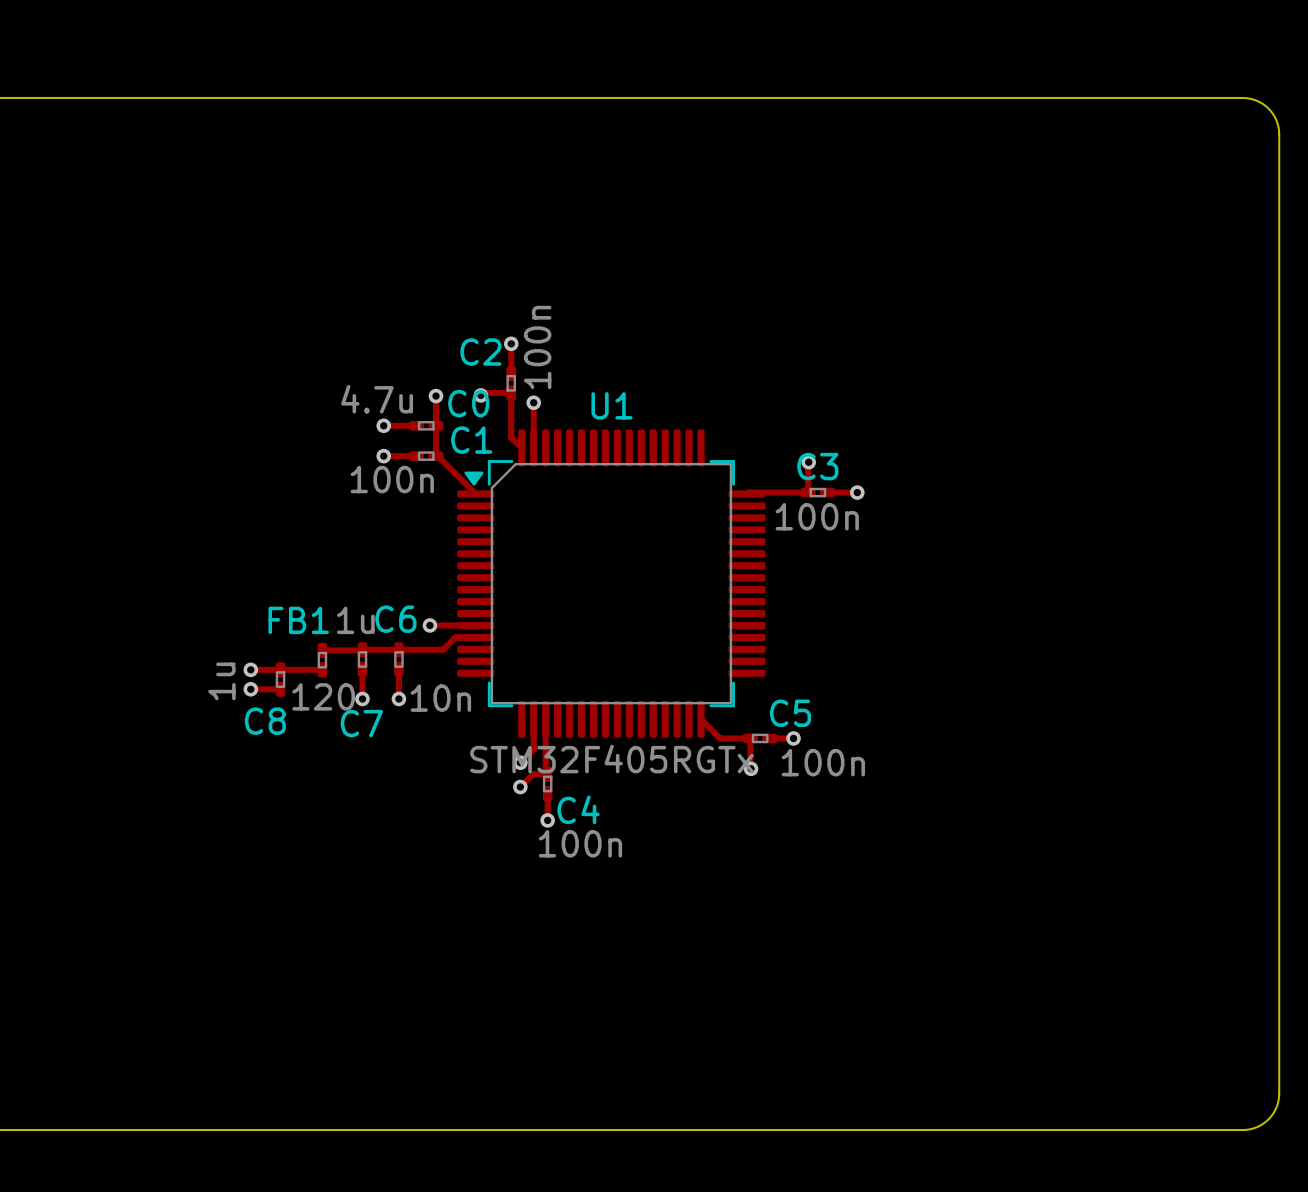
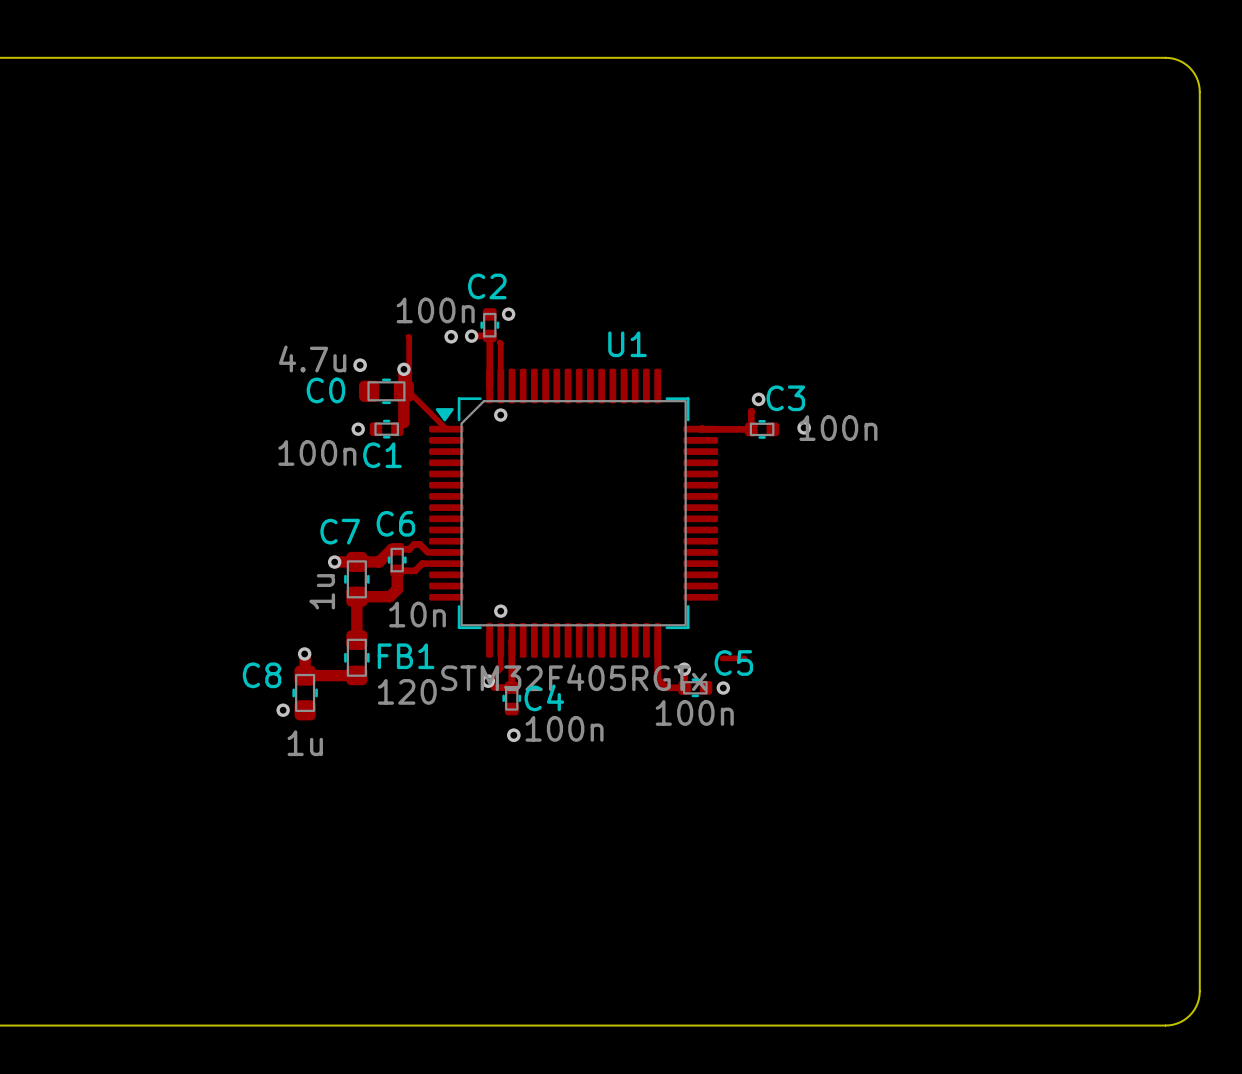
track: (511, 343) (511, 373) -> none
via: (511, 343) -> none
C2 value position: 100n (537, 347) -> 100n (435, 310)
C2 footprint: [506, 365, 517, 401] -> [480, 308, 500, 343]
via: none -> (508, 314)
via: none -> (471, 336)
track: (480, 395) (483, 393) (511, 393) (511, 437) (521, 447) -> (471, 335) (489, 335) (489, 385)
via: (435, 396) -> none
via: (533, 402) -> none
C0 name position: C0 (468, 403) -> C0 (325, 390)
U1 name position: U1 (611, 405) -> U1 (627, 344)
C0 footprint: [408, 421, 444, 431] -> [359, 378, 414, 405]
track: (383, 425) (416, 425) -> none
track: none -> (403, 369) (403, 422)
via: none -> (403, 369)
C1 name position: C1 (471, 440) -> C1 (382, 455)
C1 footprint: [408, 451, 444, 461] -> [369, 419, 404, 439]
track: (383, 456) (416, 456) -> none
via: (383, 456) -> none
track: (808, 462) (808, 492) (748, 492) -> none
track: none -> (751, 411) (751, 429) (701, 429)
via: none -> (500, 415)
C3 footprint: [800, 487, 836, 498] -> [745, 419, 780, 439]
track: (827, 492) (857, 492) -> none
via: none -> (358, 429)
C3 value position: 100n (817, 516) -> 100n (838, 428)
FB1 name position: FB1 (298, 620) -> FB1 (406, 656)
C7 value position: 1u (355, 620) -> 1u (322, 591)
via: (429, 625) -> none
track: (456, 625) (429, 626) -> (427, 552) (419, 544) (414, 544) (409, 549) (391, 549) (379, 561) (334, 561)
via: none -> (334, 562)
track: (455, 637) (443, 649) (322, 650) -> (427, 563) (422, 563) (415, 570) (397, 570) (397, 588)
FB1 footprint: [317, 642, 328, 678] -> [344, 630, 370, 686]
C7 footprint: [357, 642, 368, 677] -> [344, 551, 370, 607]
C6 footprint: [394, 642, 404, 677] -> [387, 543, 407, 578]
C8 footprint: [275, 662, 286, 697] -> [292, 665, 318, 721]
track: none -> (397, 589) (389, 596) (356, 596) (356, 640)
track: (250, 669) (322, 669) -> none
via: (250, 669) -> none
track: (362, 669) (362, 698) -> none
track: (398, 669) (398, 698) -> none
C8 value position: 1u (221, 681) -> 1u (305, 743)
via: none -> (500, 611)
track: (250, 689) (280, 689) -> none
via: (250, 689) -> none
FB1 value position: 120 (323, 696) -> 120 (407, 691)
via: (362, 698) -> none
via: (398, 698) -> none
track: (545, 719) (545, 772) (547, 774) (533, 774) (520, 787) -> (511, 640) (511, 687) (494, 687)
track: (701, 719) (720, 738) (750, 738) (751, 768) -> (657, 640) (657, 679) (666, 687) (684, 687) (684, 669)
C8 name position: C8 (265, 721) -> C8 (262, 675)
C7 name position: C7 (361, 723) -> C7 (340, 531)
track: none -> (304, 653) (305, 675) (356, 675)
via: none -> (304, 653)
C5 footprint: [742, 733, 778, 744] -> [678, 678, 713, 698]
via: (793, 738) -> none
via: none -> (684, 669)
C5 value position: 100n (823, 762) -> 100n (694, 712)
C4 footprint: [542, 766, 553, 802] -> [502, 681, 522, 716]
via: (751, 768) -> none
via: none -> (723, 688)
via: (520, 787) -> none
via: none -> (283, 710)
track: (547, 793) (547, 820) -> none

